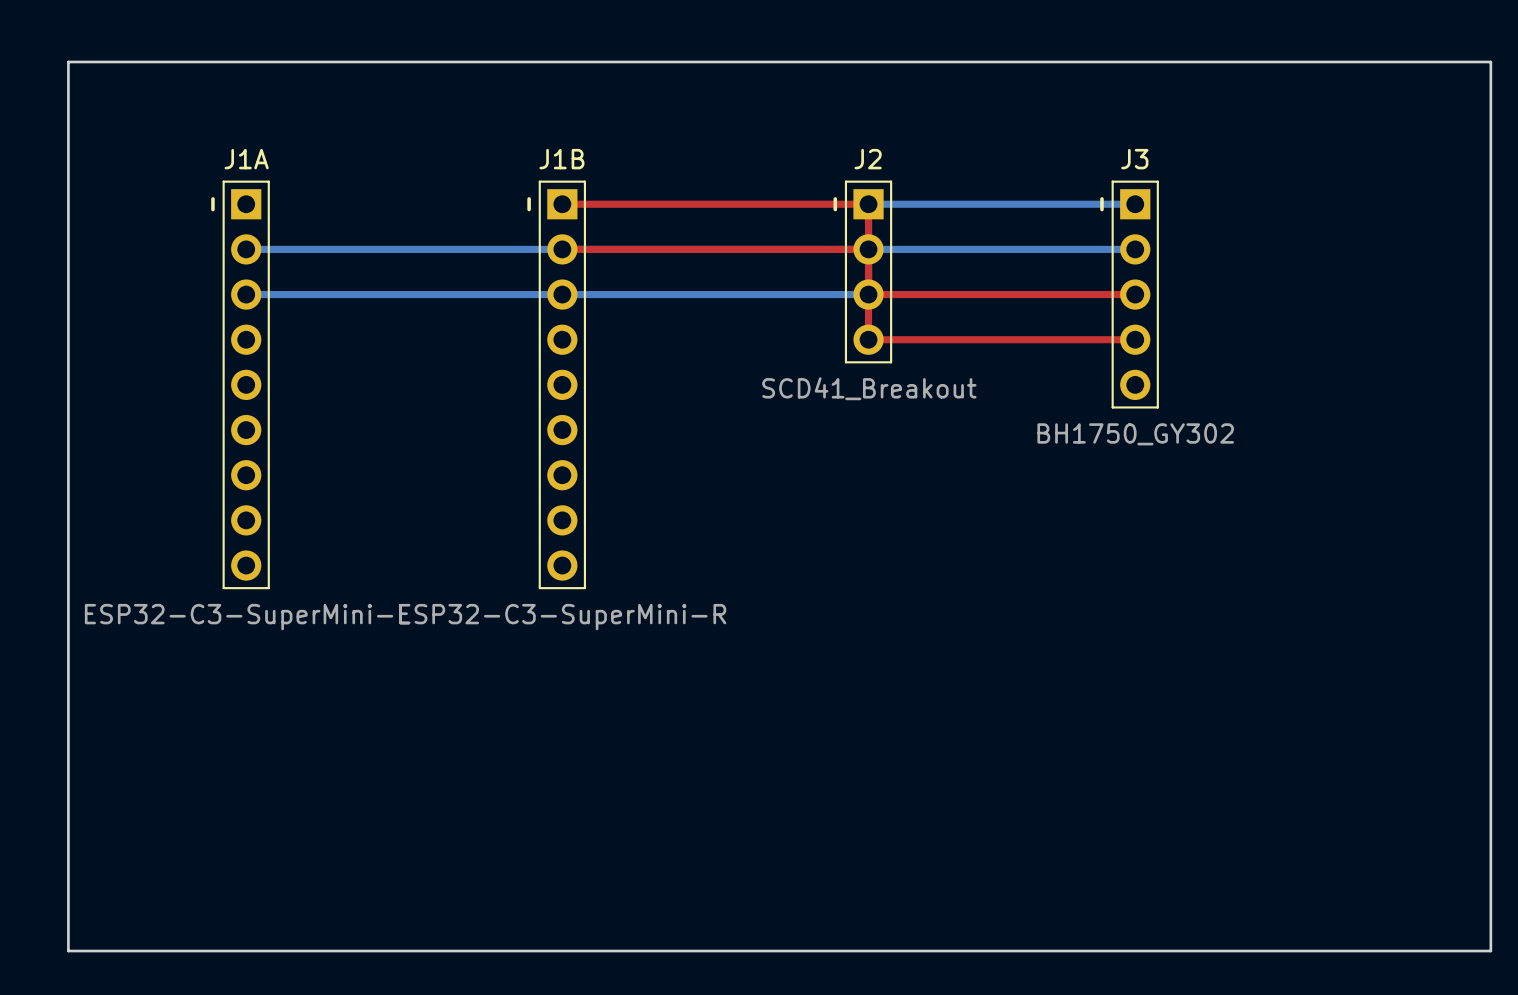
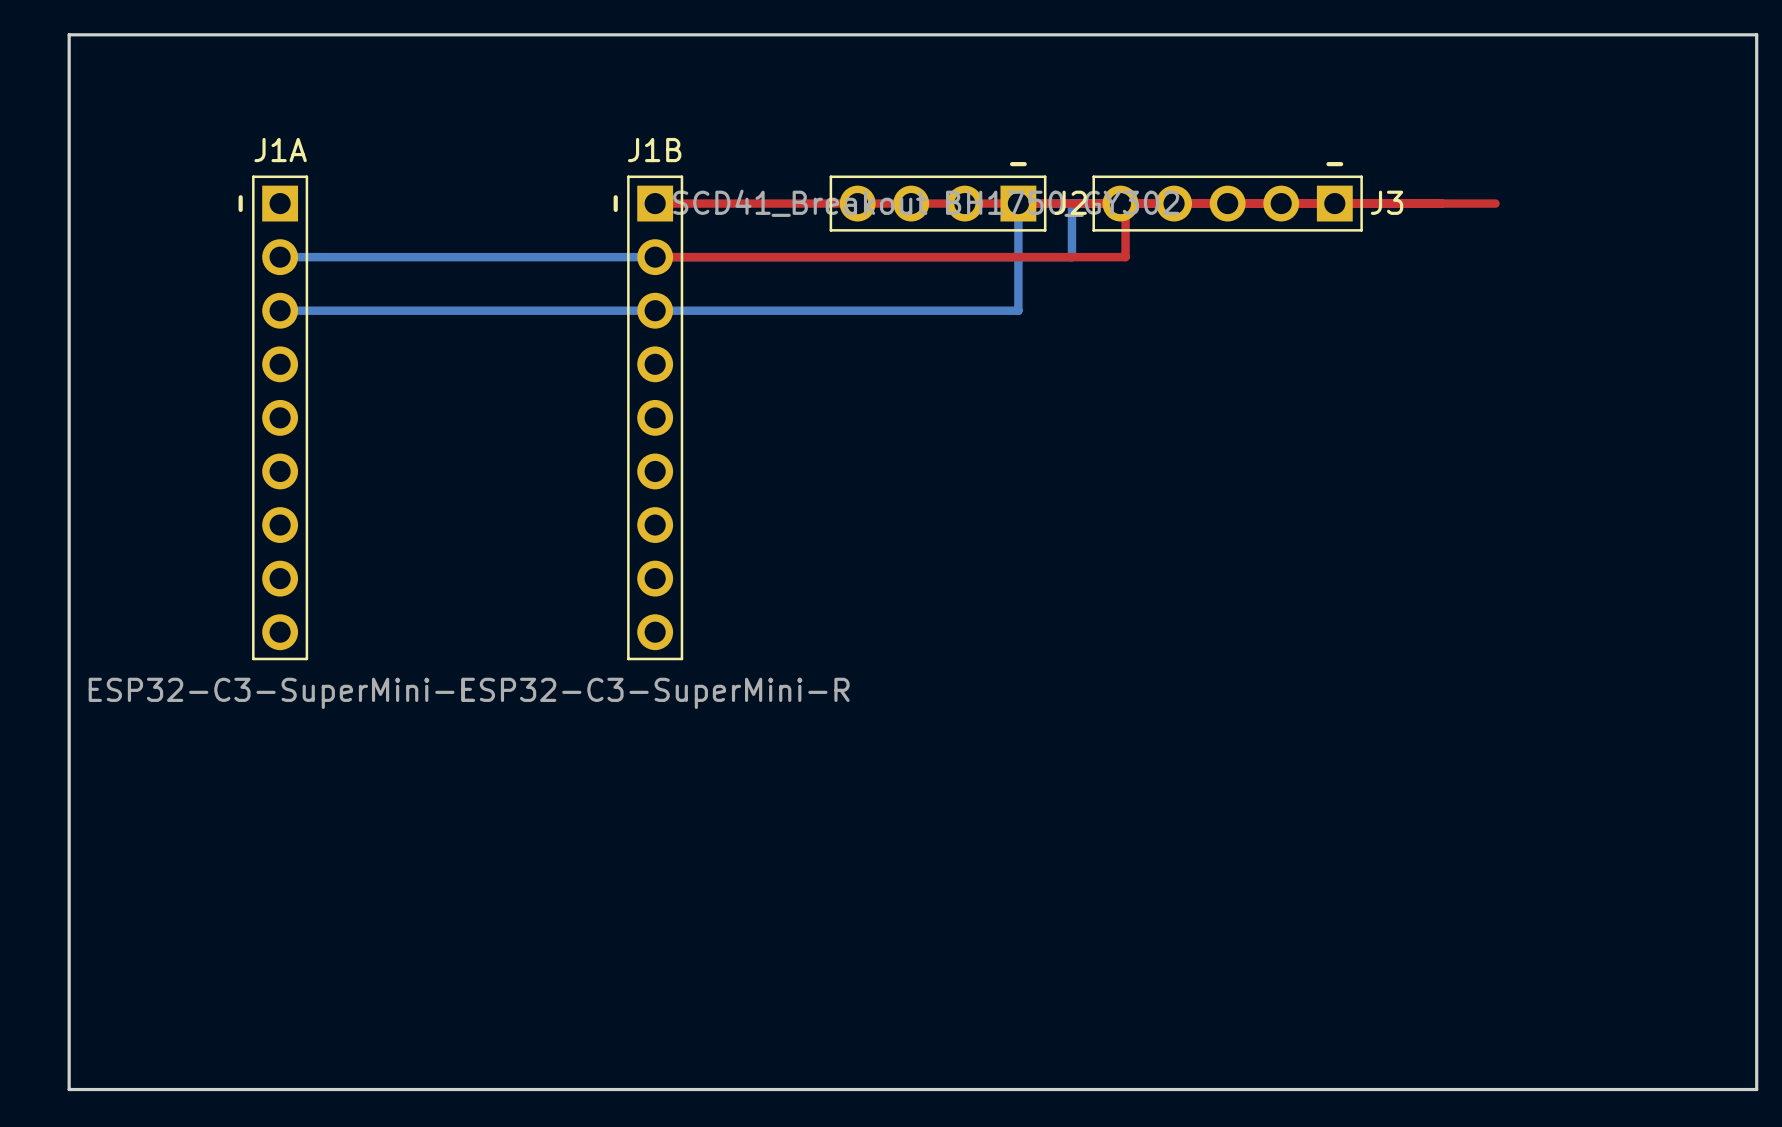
top track: (868, 204) (868, 339) (1135, 339) -> (1018, 203) (1495, 203)
top track: none -> (1125, 203) (1125, 257) (1018, 257)
bottom track: (913, 249) (1135, 249) -> (1071, 257) (1071, 203)
J2 rotation: 0° (862, 271) -> 90° clockwise (938, 196)
top track: (868, 294) (1135, 294) -> none
J3 rotation: 0° (1129, 294) -> 90° clockwise (1227, 196)

